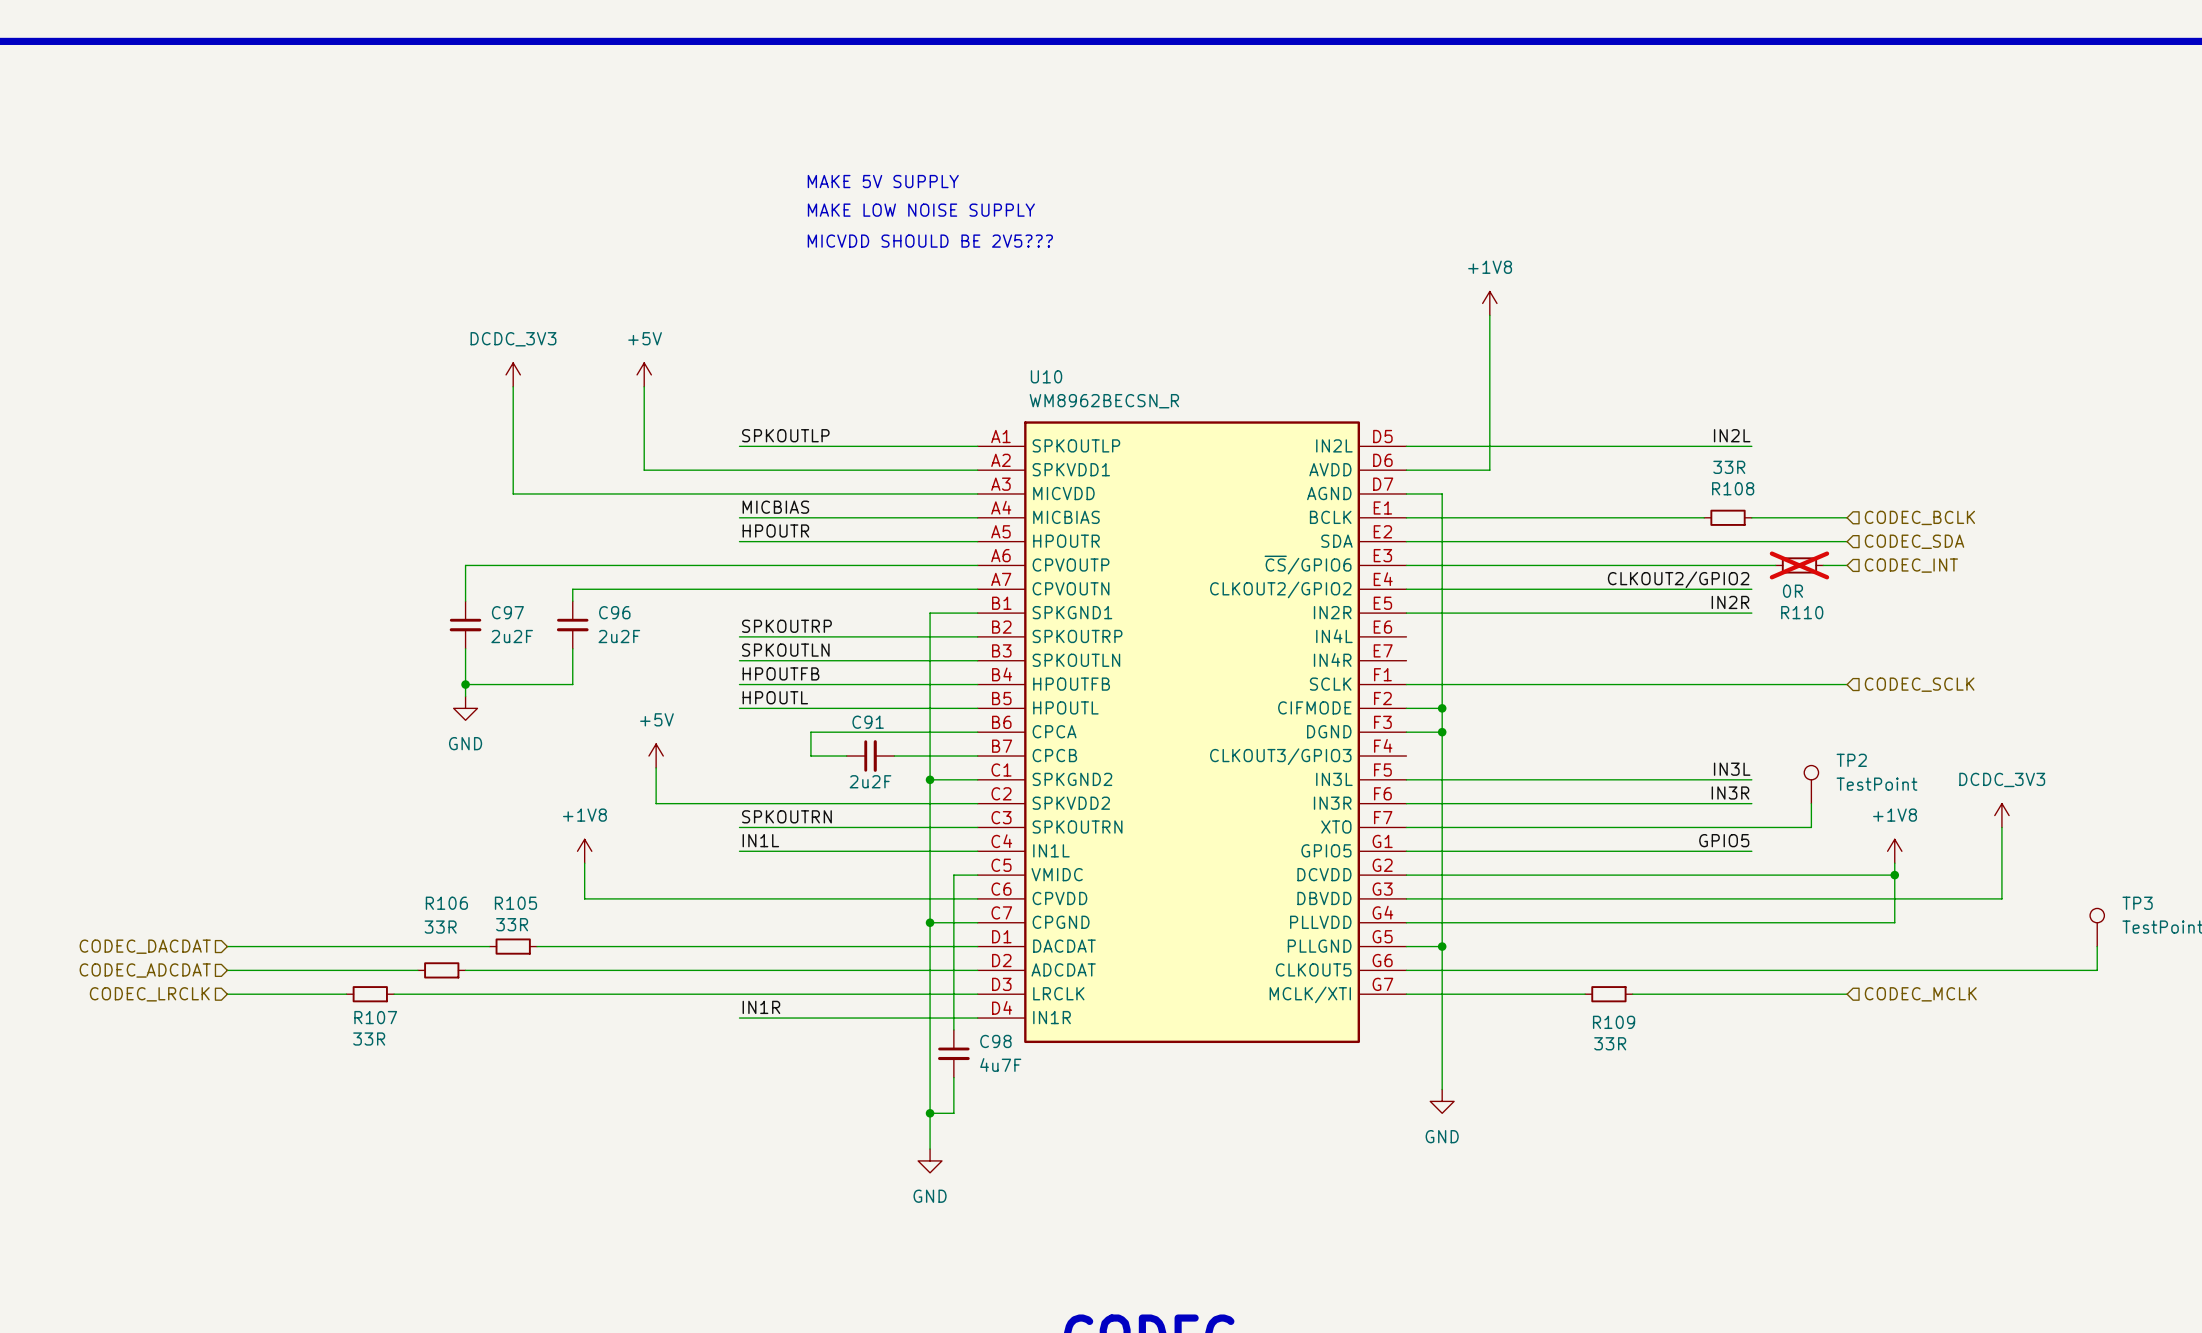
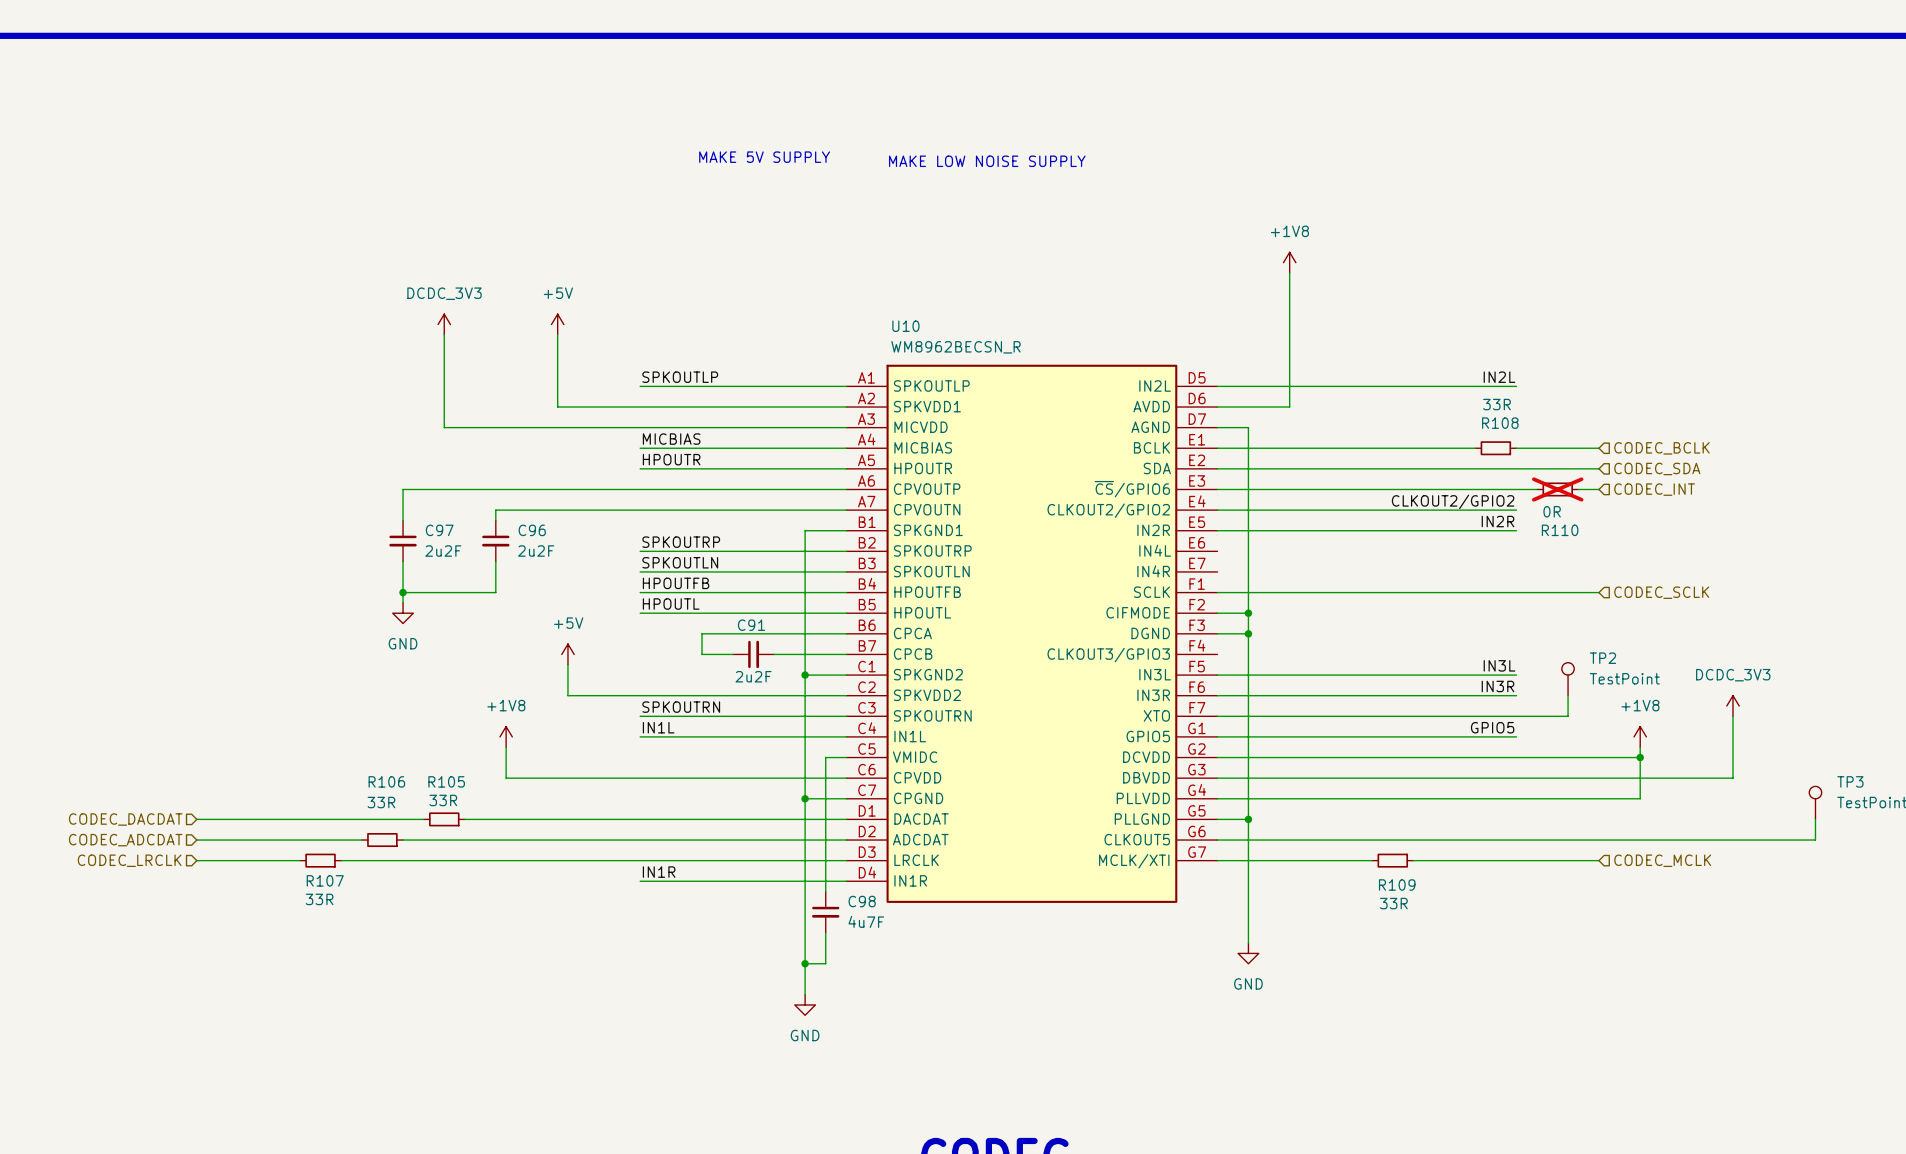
text position: MAKE LOW NOISE SUPPLY (921, 210) -> MAKE LOW NOISE SUPPLY (987, 161)
text: MICVDD SHOULD BE 2V5??? (930, 241) -> none

